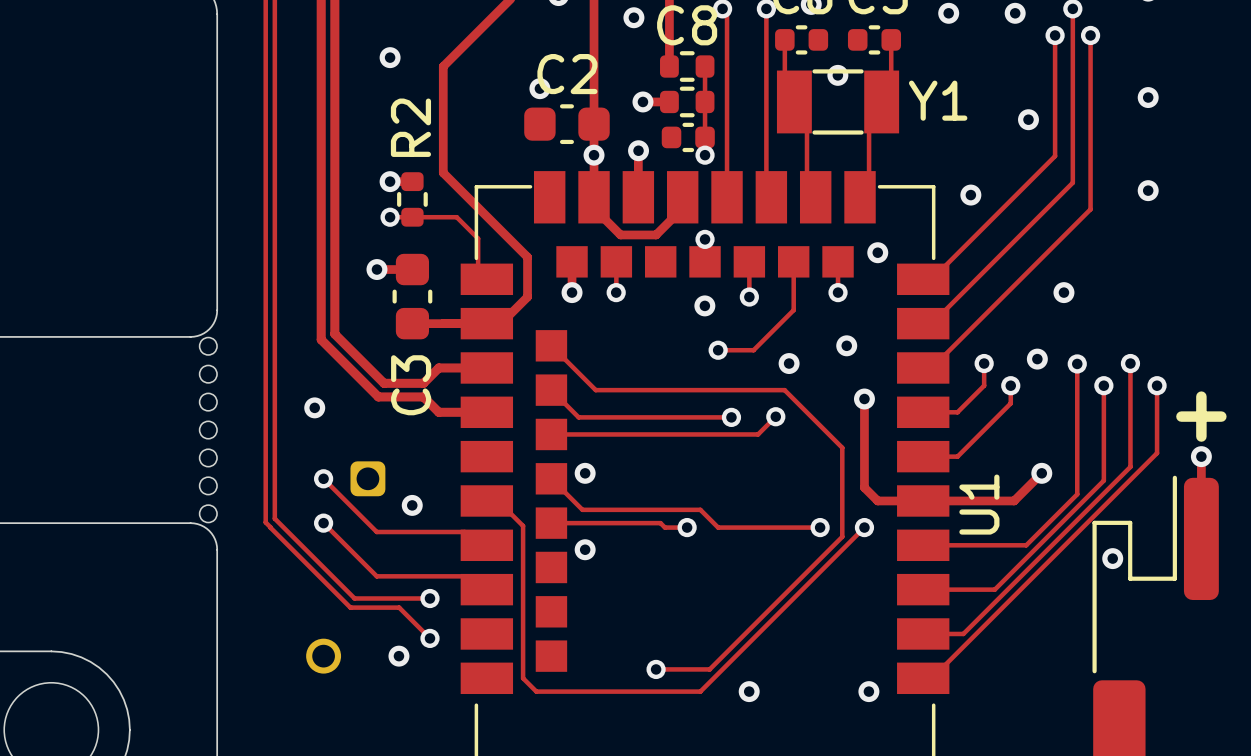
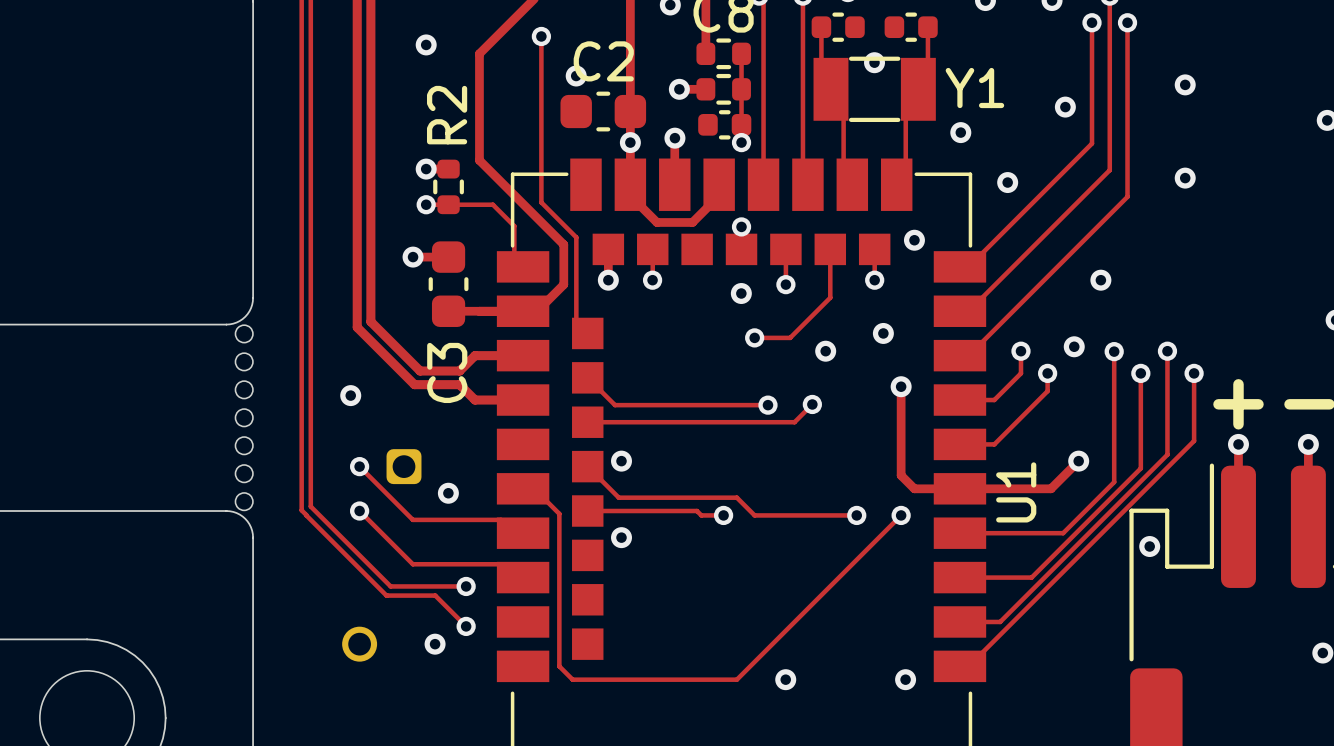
via: none -> (541, 36)
via: none -> (960, 132)
track: (551, 345) (595, 390) (784, 390) (842, 447) (842, 536) (709, 669) (656, 669) -> (587, 333) (576, 322) (576, 237) (541, 202) (541, 36)
via: (656, 669) -> none

